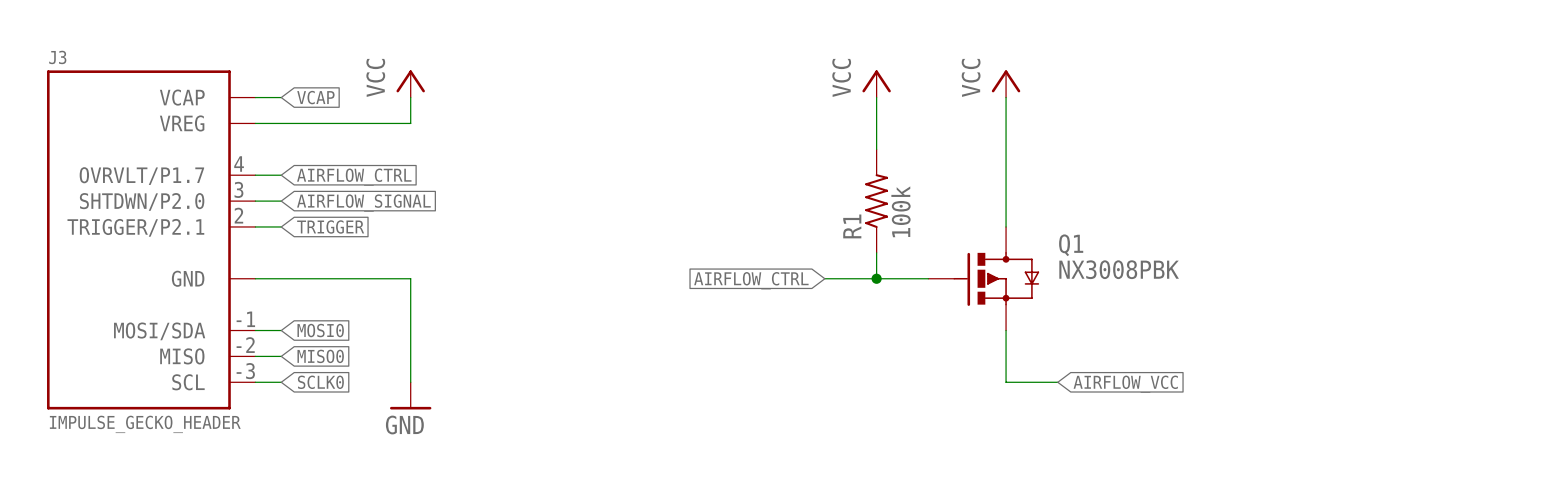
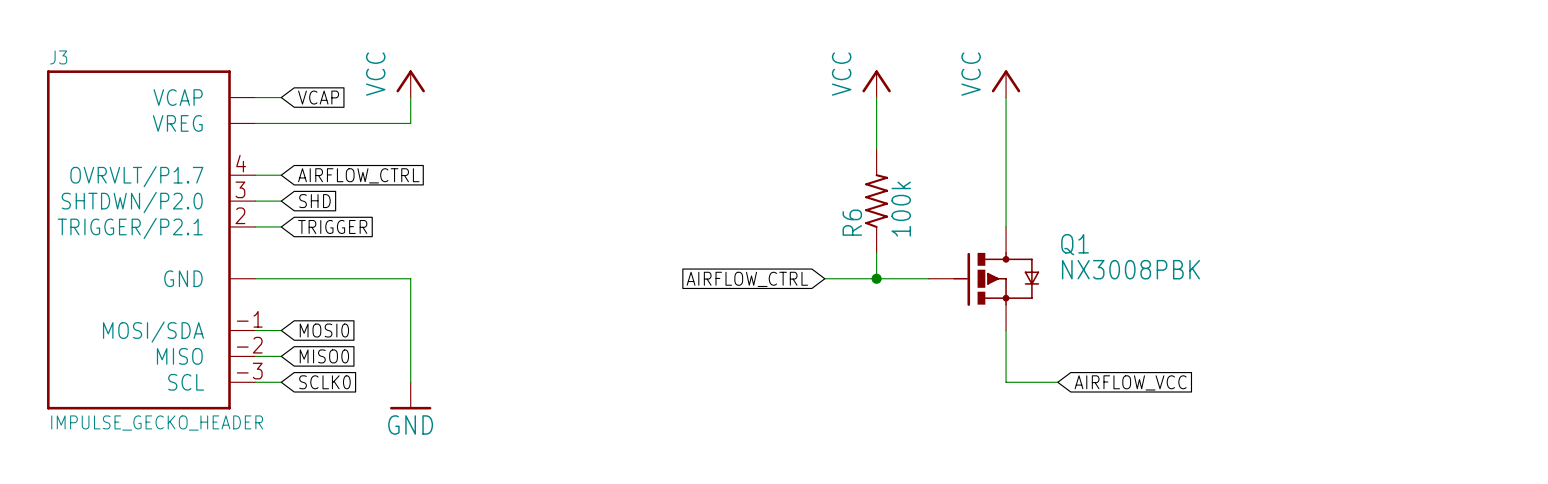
global label: AIRFLOW_SIGNAL (363, 203) -> SHD (314, 201)
R1 name: R1 (852, 226) -> R6 (852, 222)

